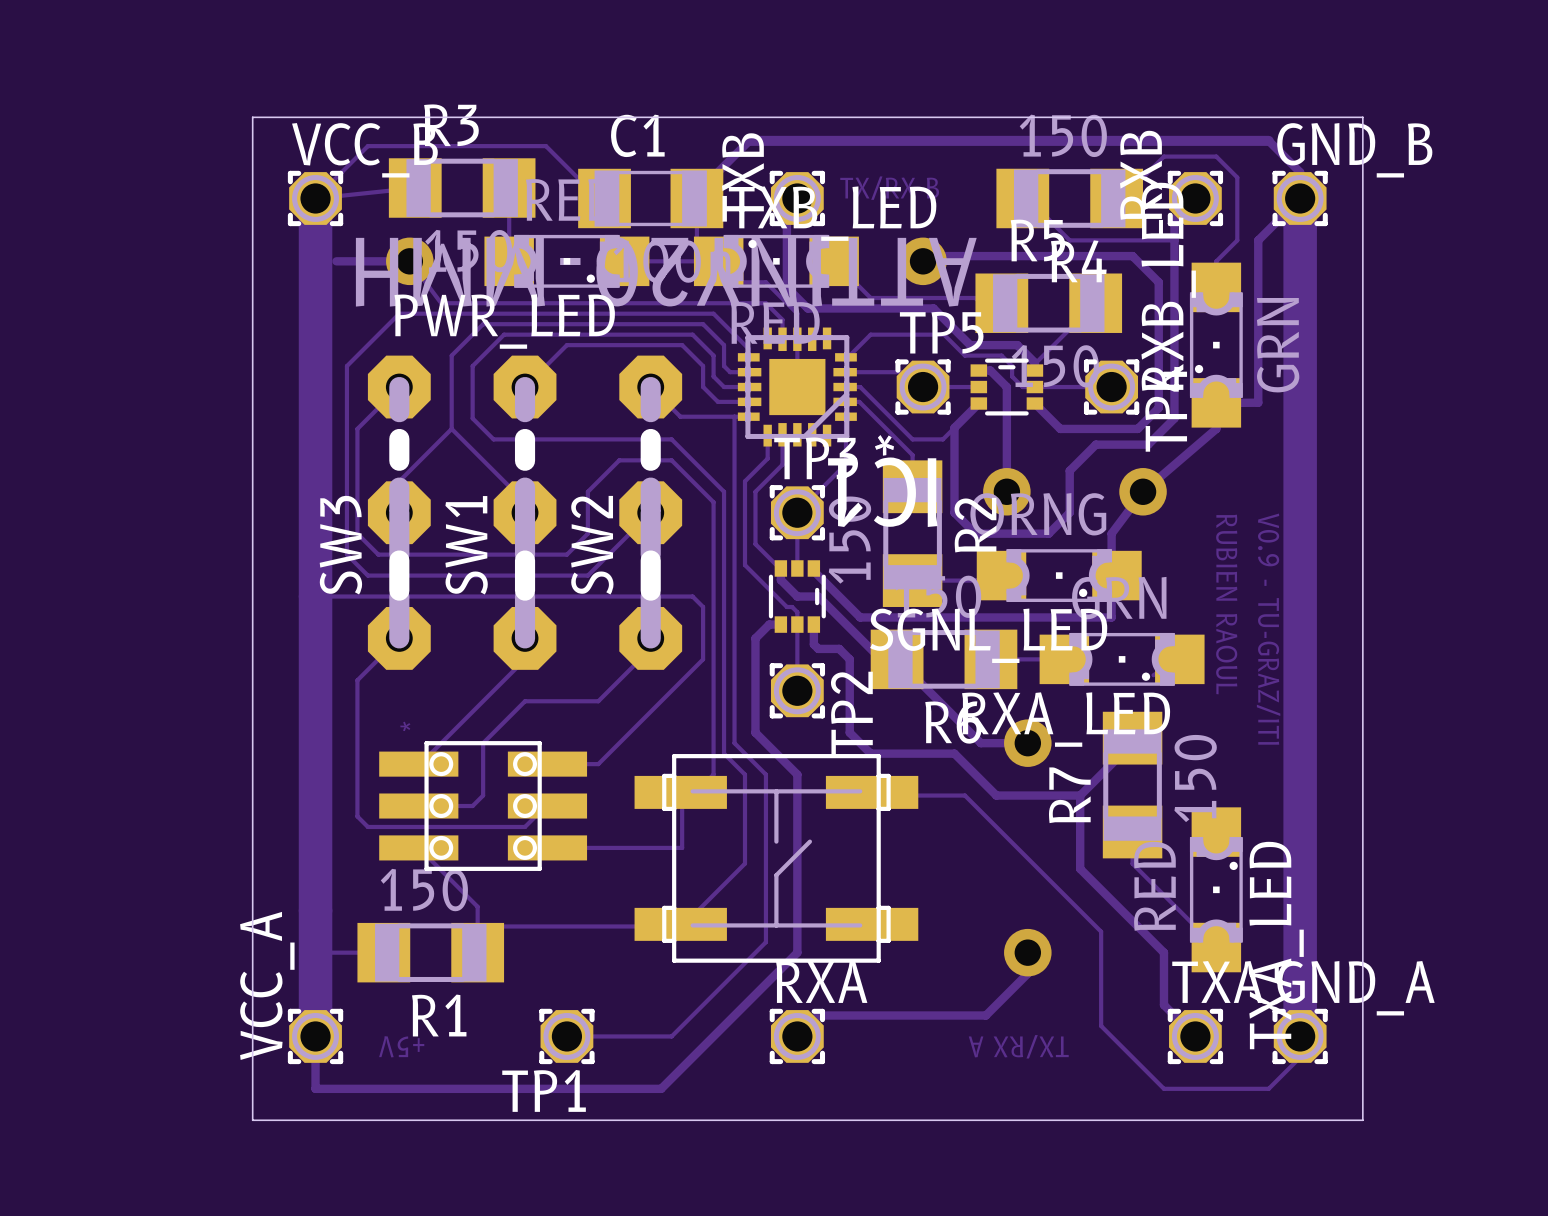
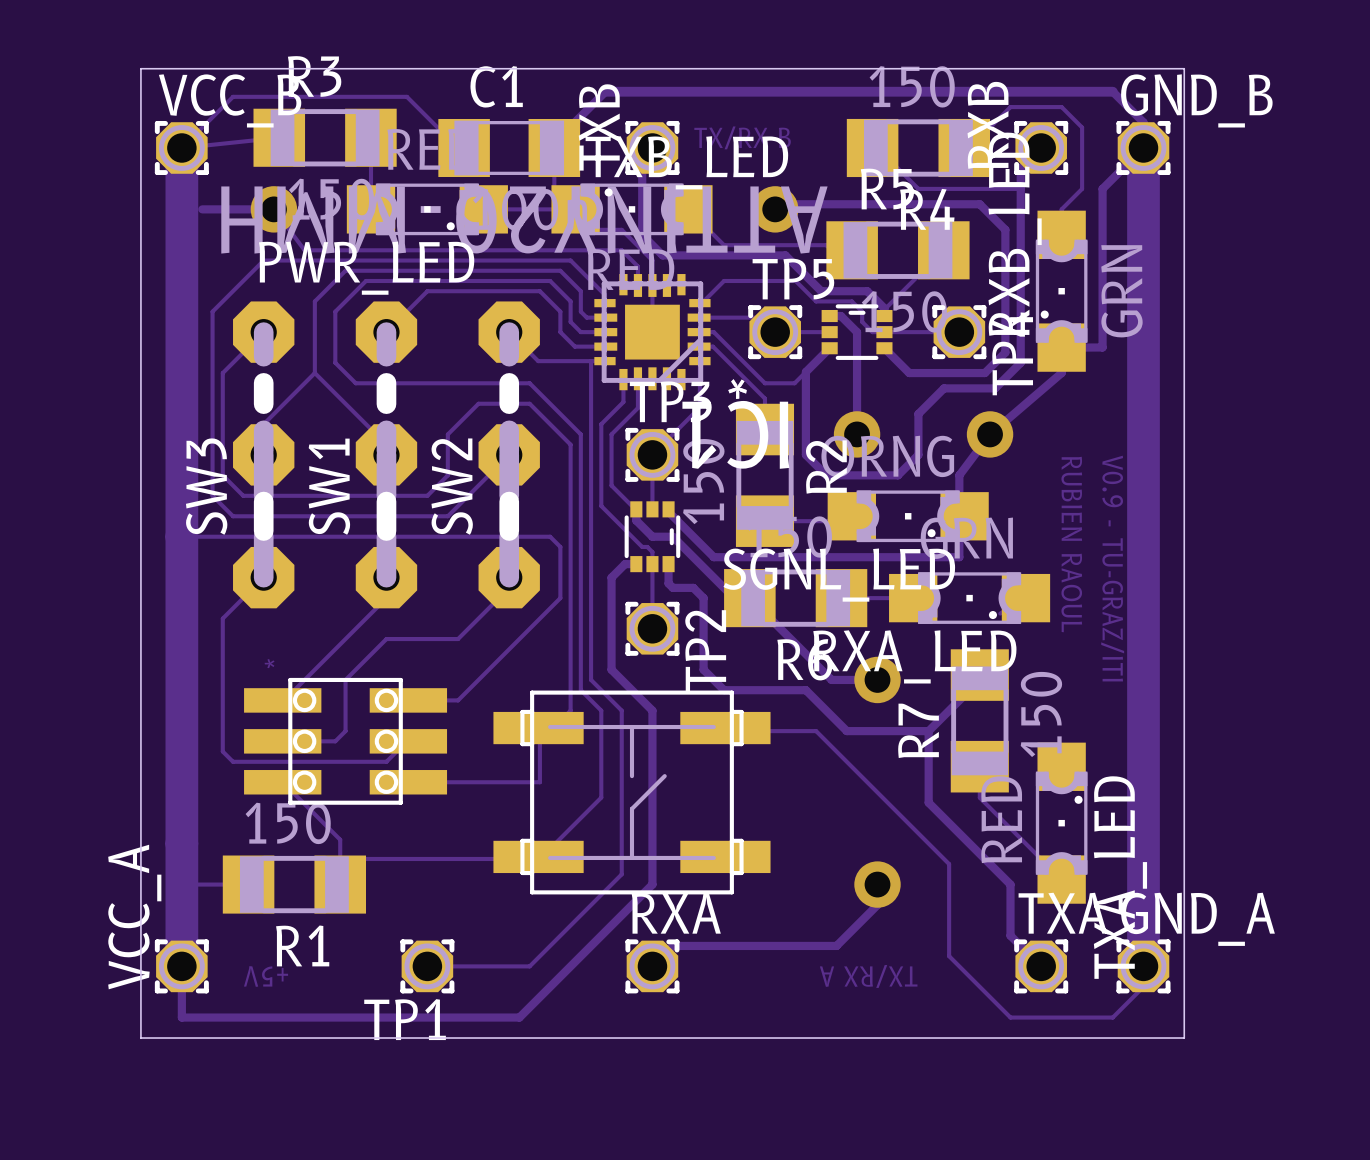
board edge: (273, 117) (252, 117) (252, 1120) (1362, 1120) (1362, 117) (1341, 117) -> (140, 68) (140, 1038) (1184, 1038) (1184, 68)

